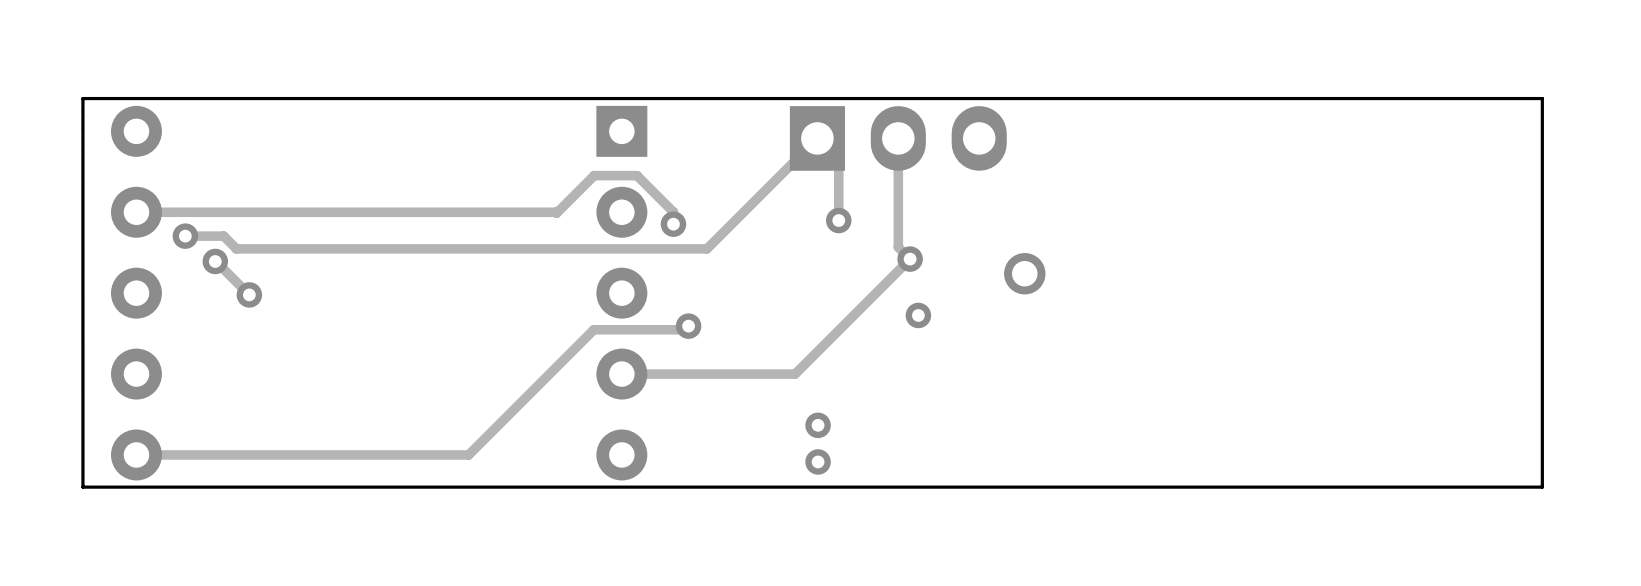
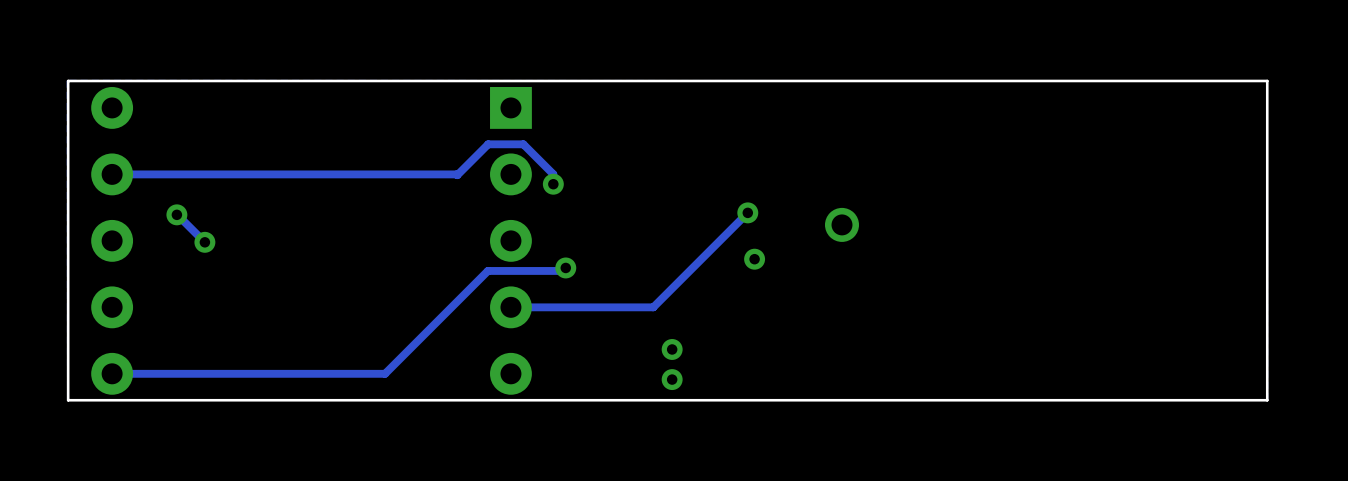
track: (898, 138) (898, 247) (910, 259) -> none
part: (898, 138) -> none
track: (838, 220) (838, 159) (817, 138) (706, 248) (236, 248) (223, 236) (185, 236) -> none
via: (838, 220) -> none
via: (185, 236) -> none

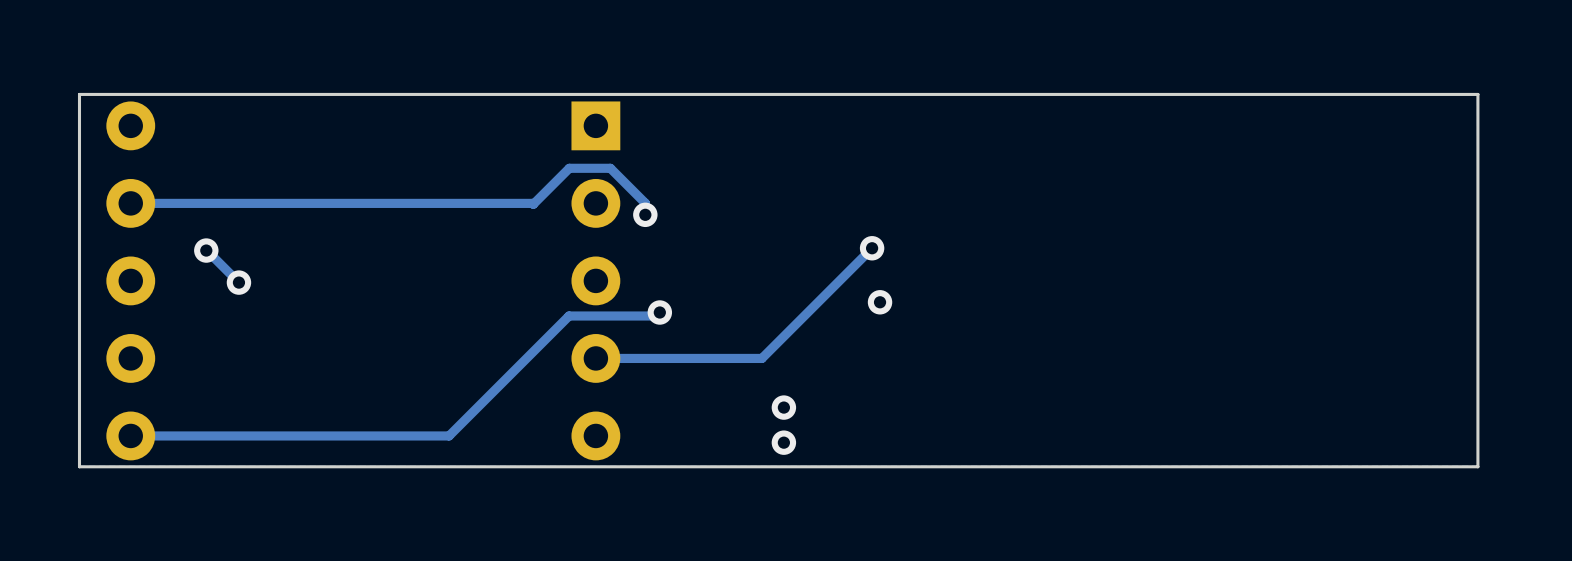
via: (842, 224) -> none

